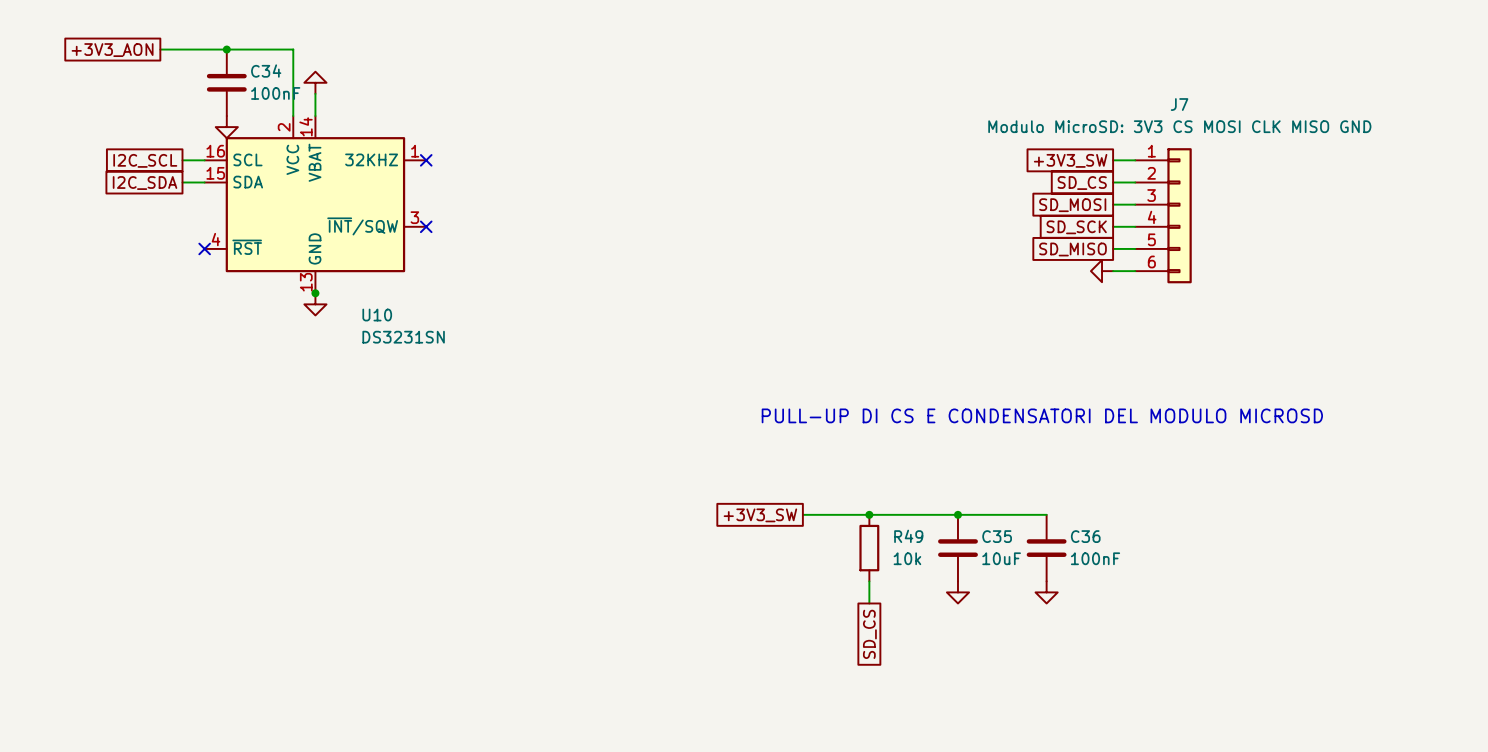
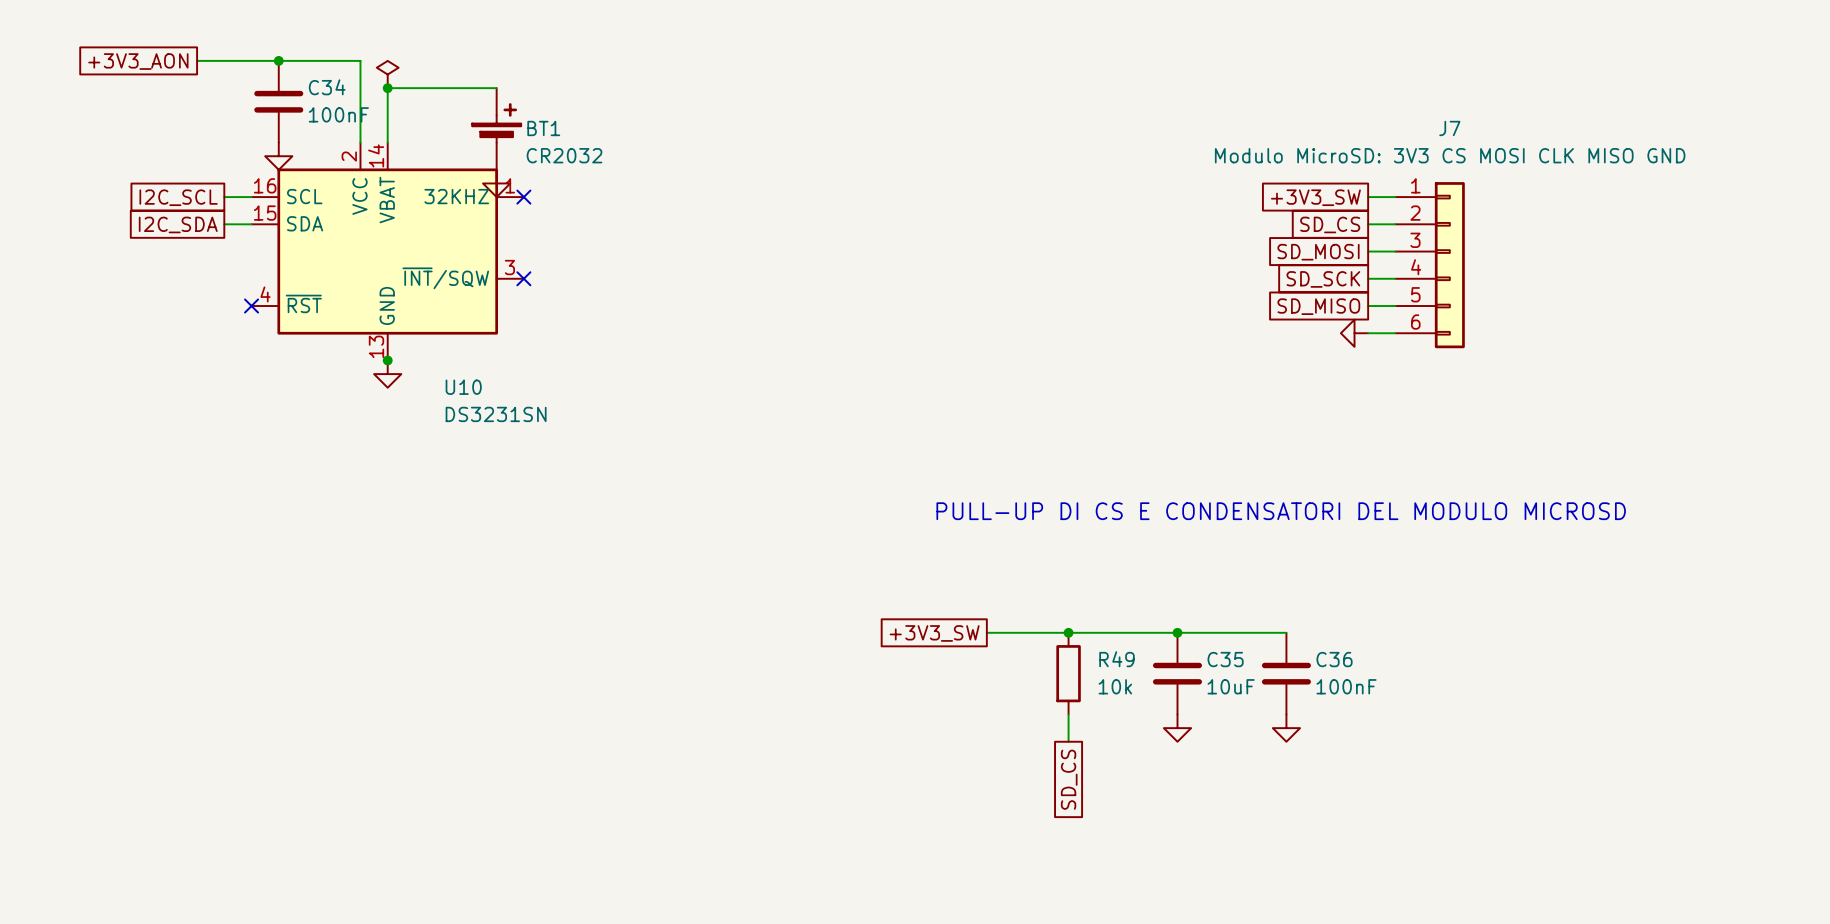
power symbol: none -> (387, 74)
junction: none -> (387, 88)
wire: none -> (496, 88) (387, 88) (387, 115)
power symbol rotation: 0° (315, 82) -> 180° (496, 183)
power symbol position: (315, 82) -> (496, 183)
BT1: none -> CR2032 (496, 128)

